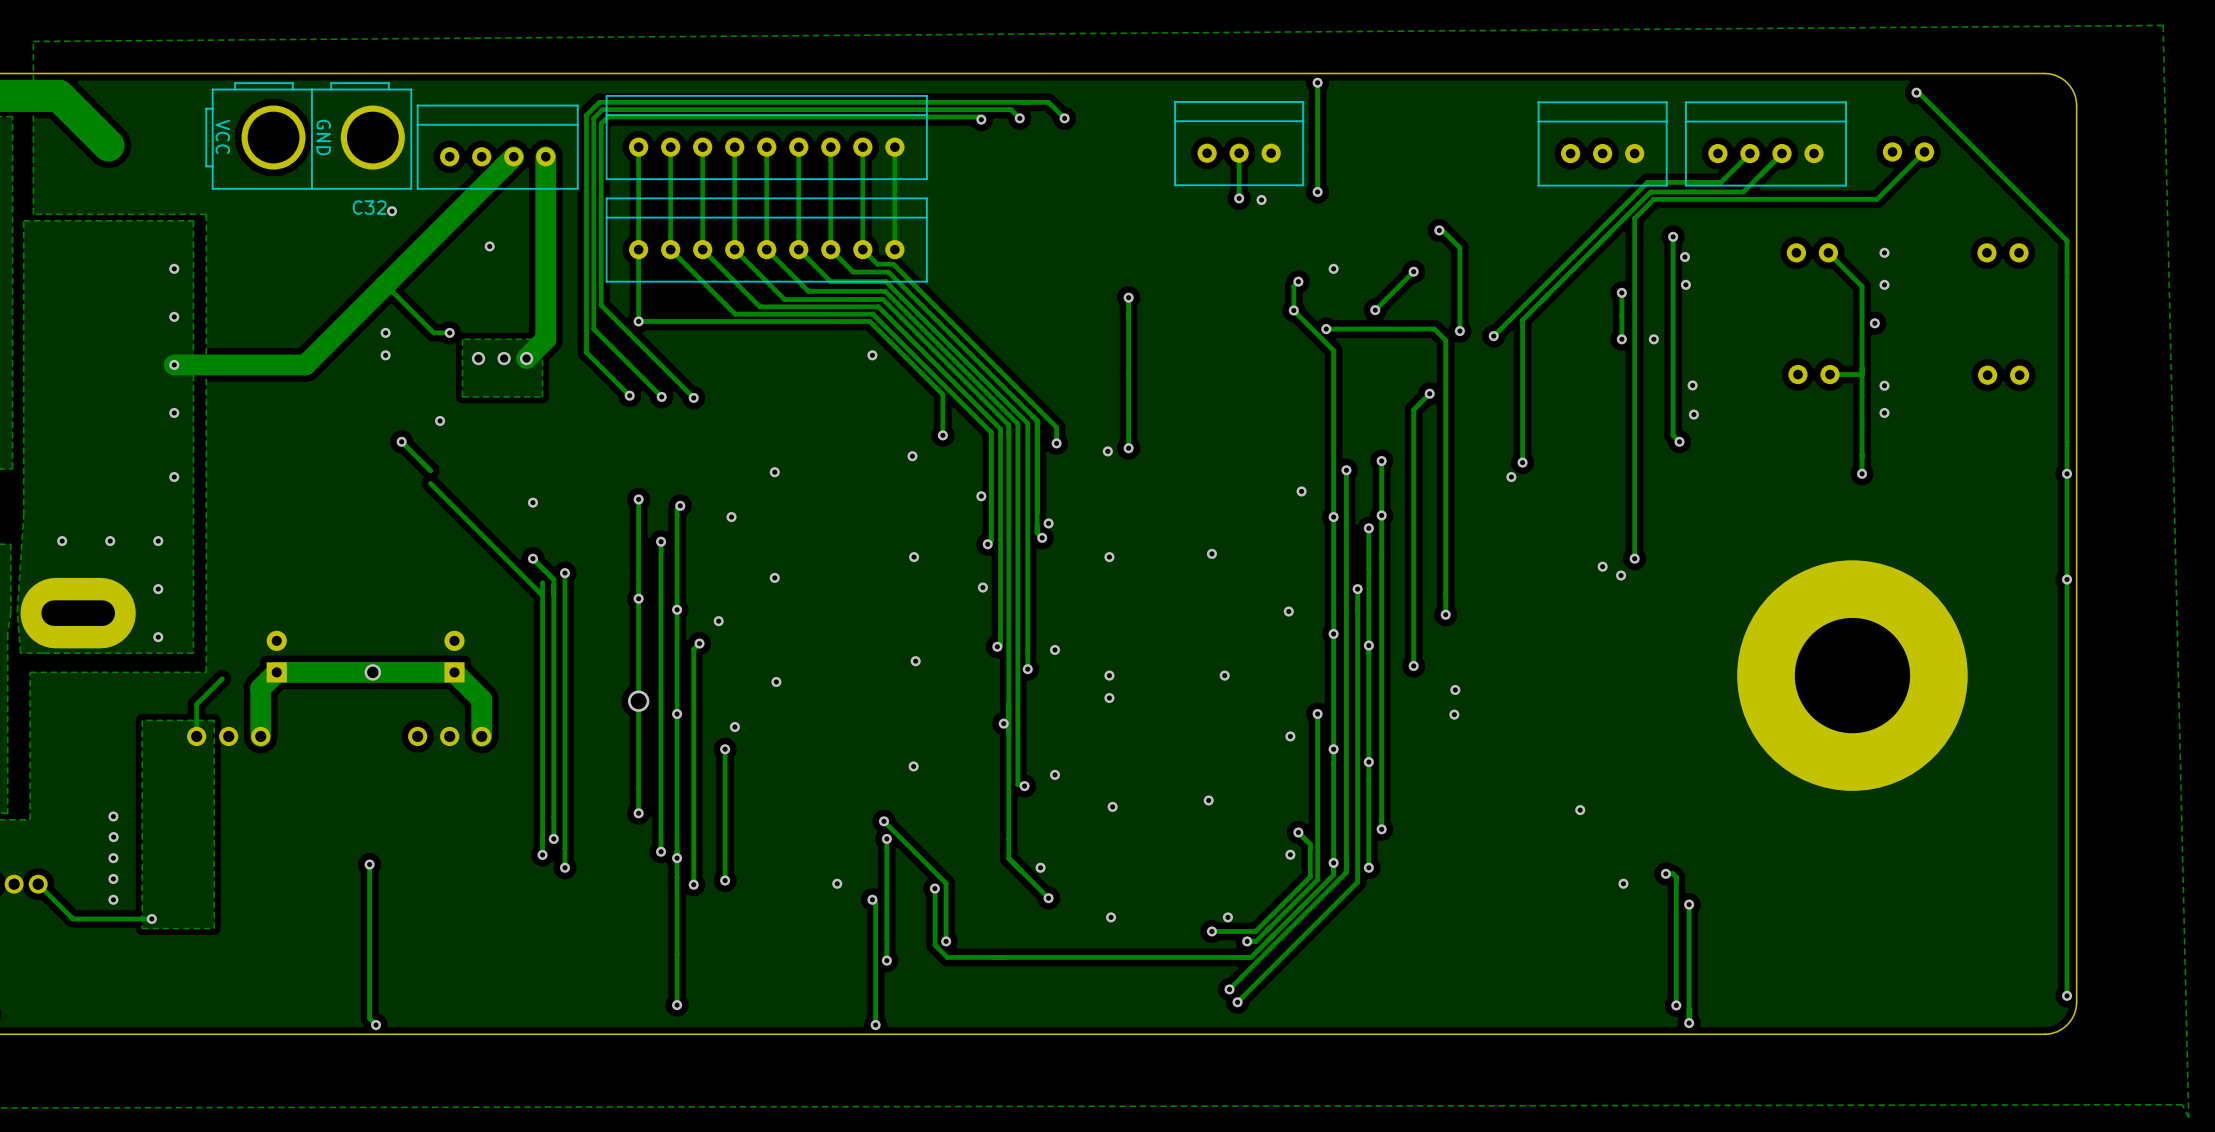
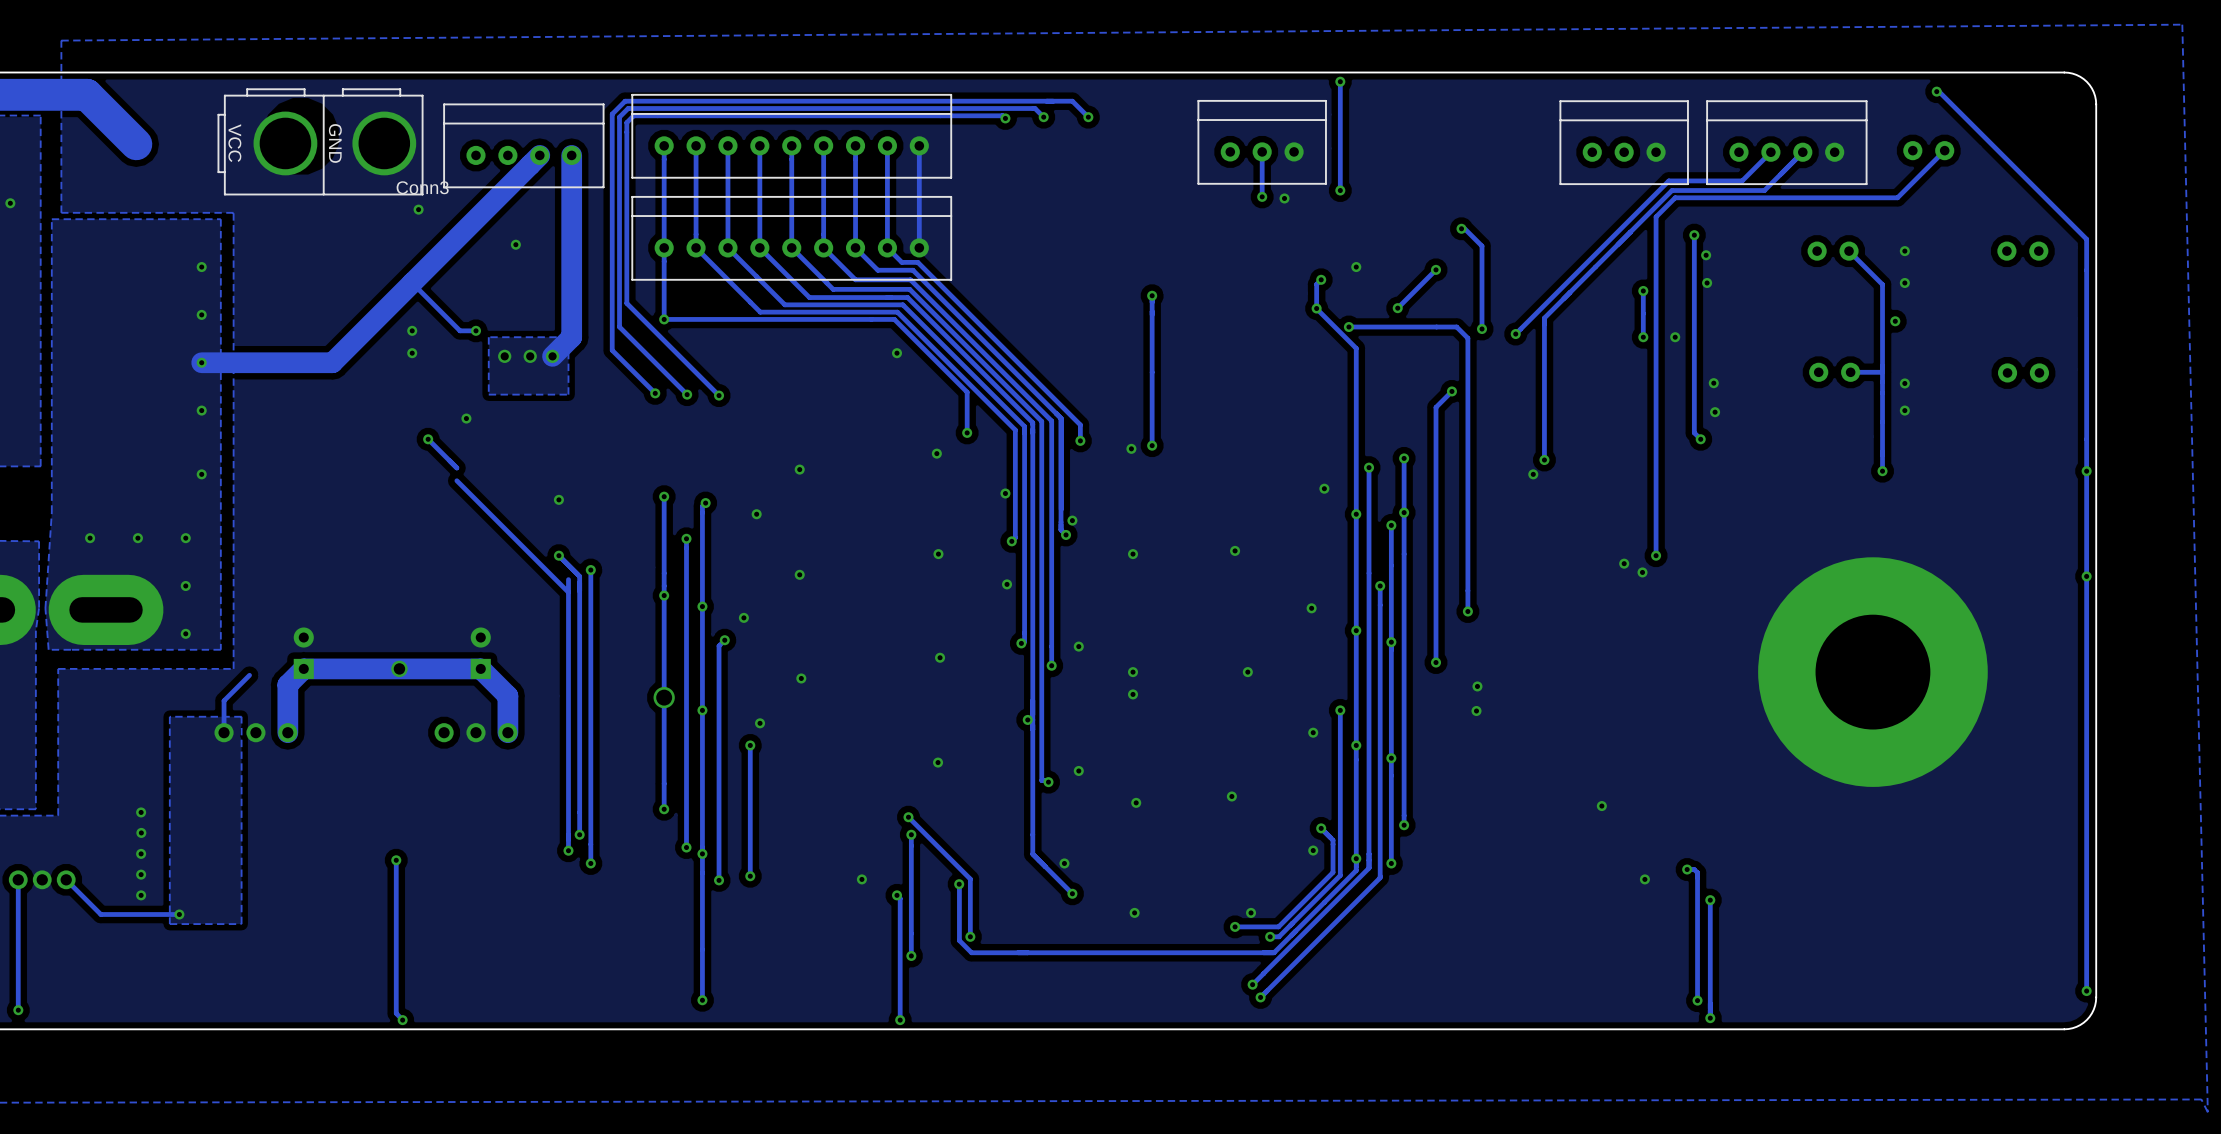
C32: (308, 135) -> none
Conn3: none -> (320, 141)

